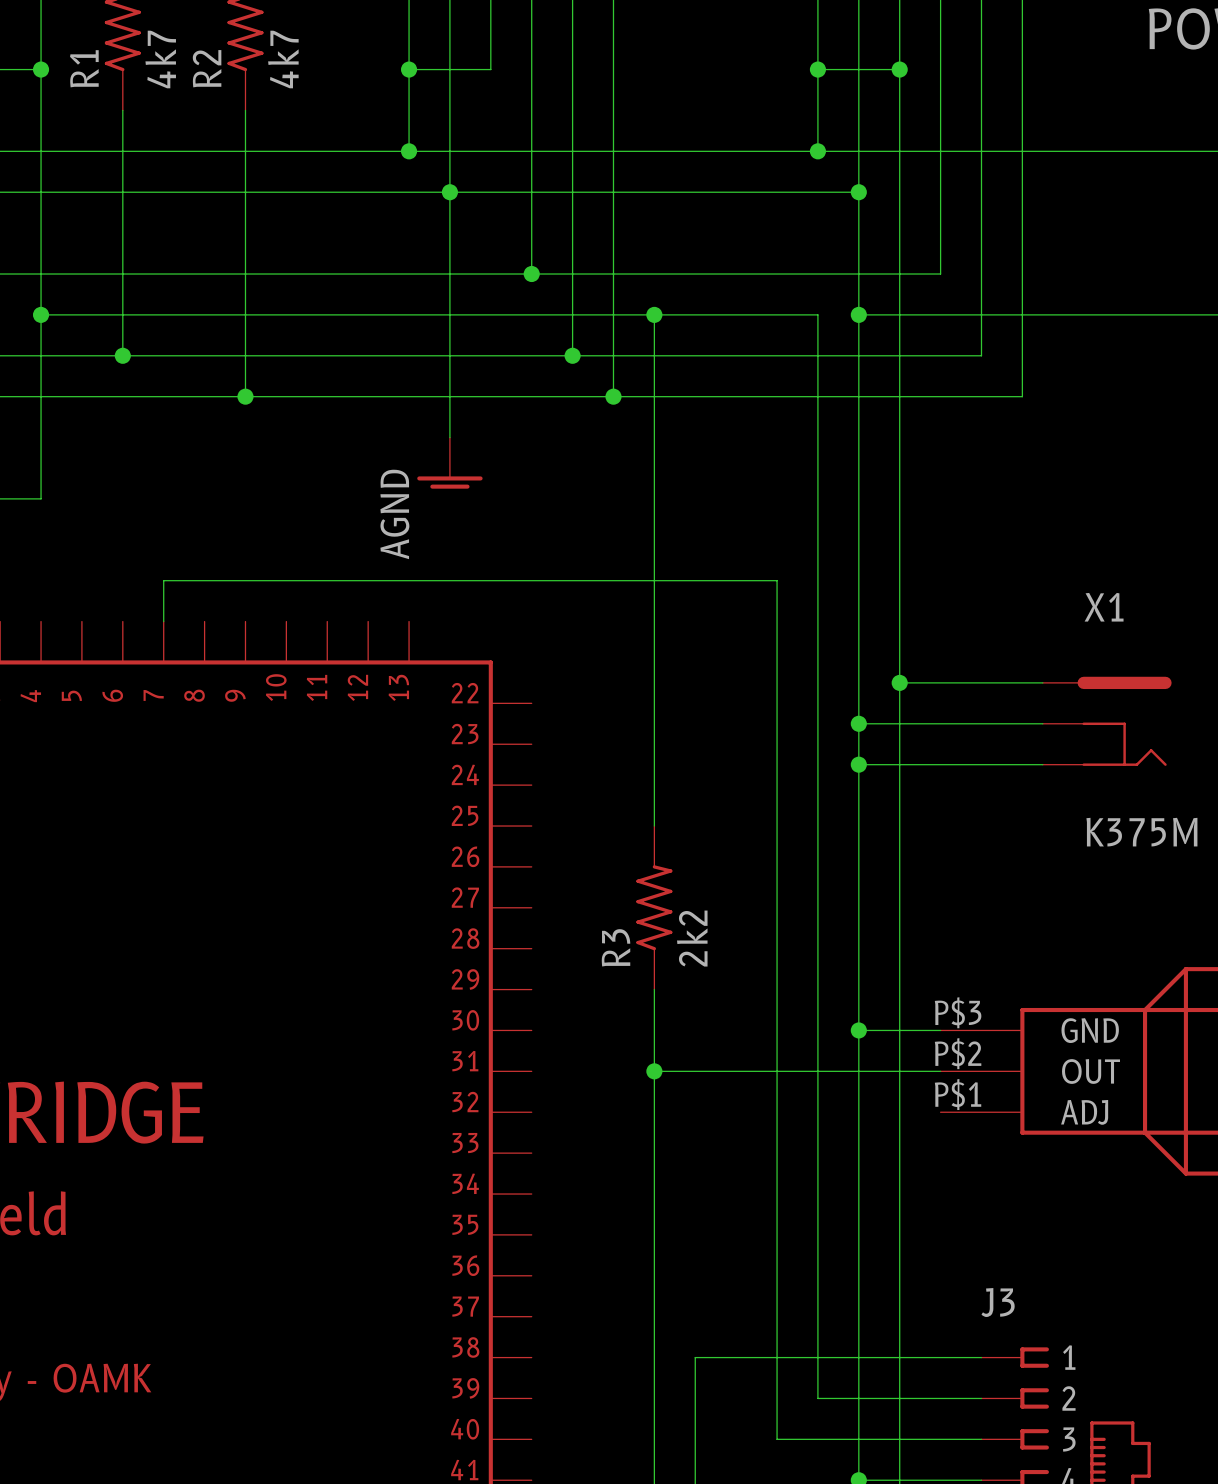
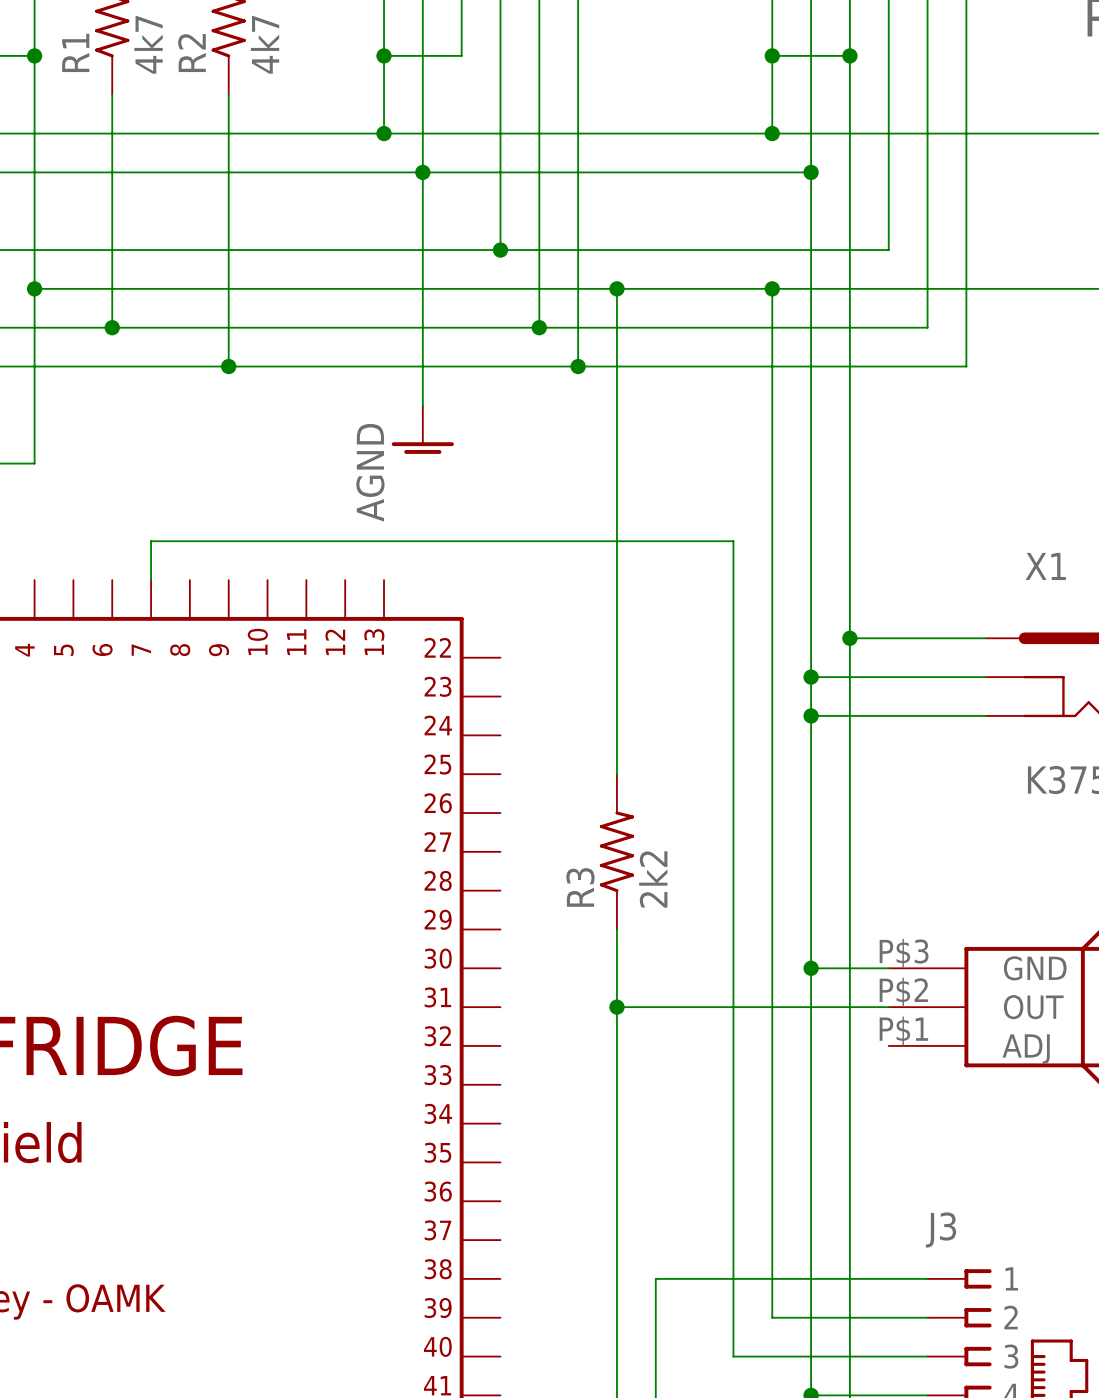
wire: none -> (772, 288) (811, 288)
junction position: (858, 314) -> (772, 288)

